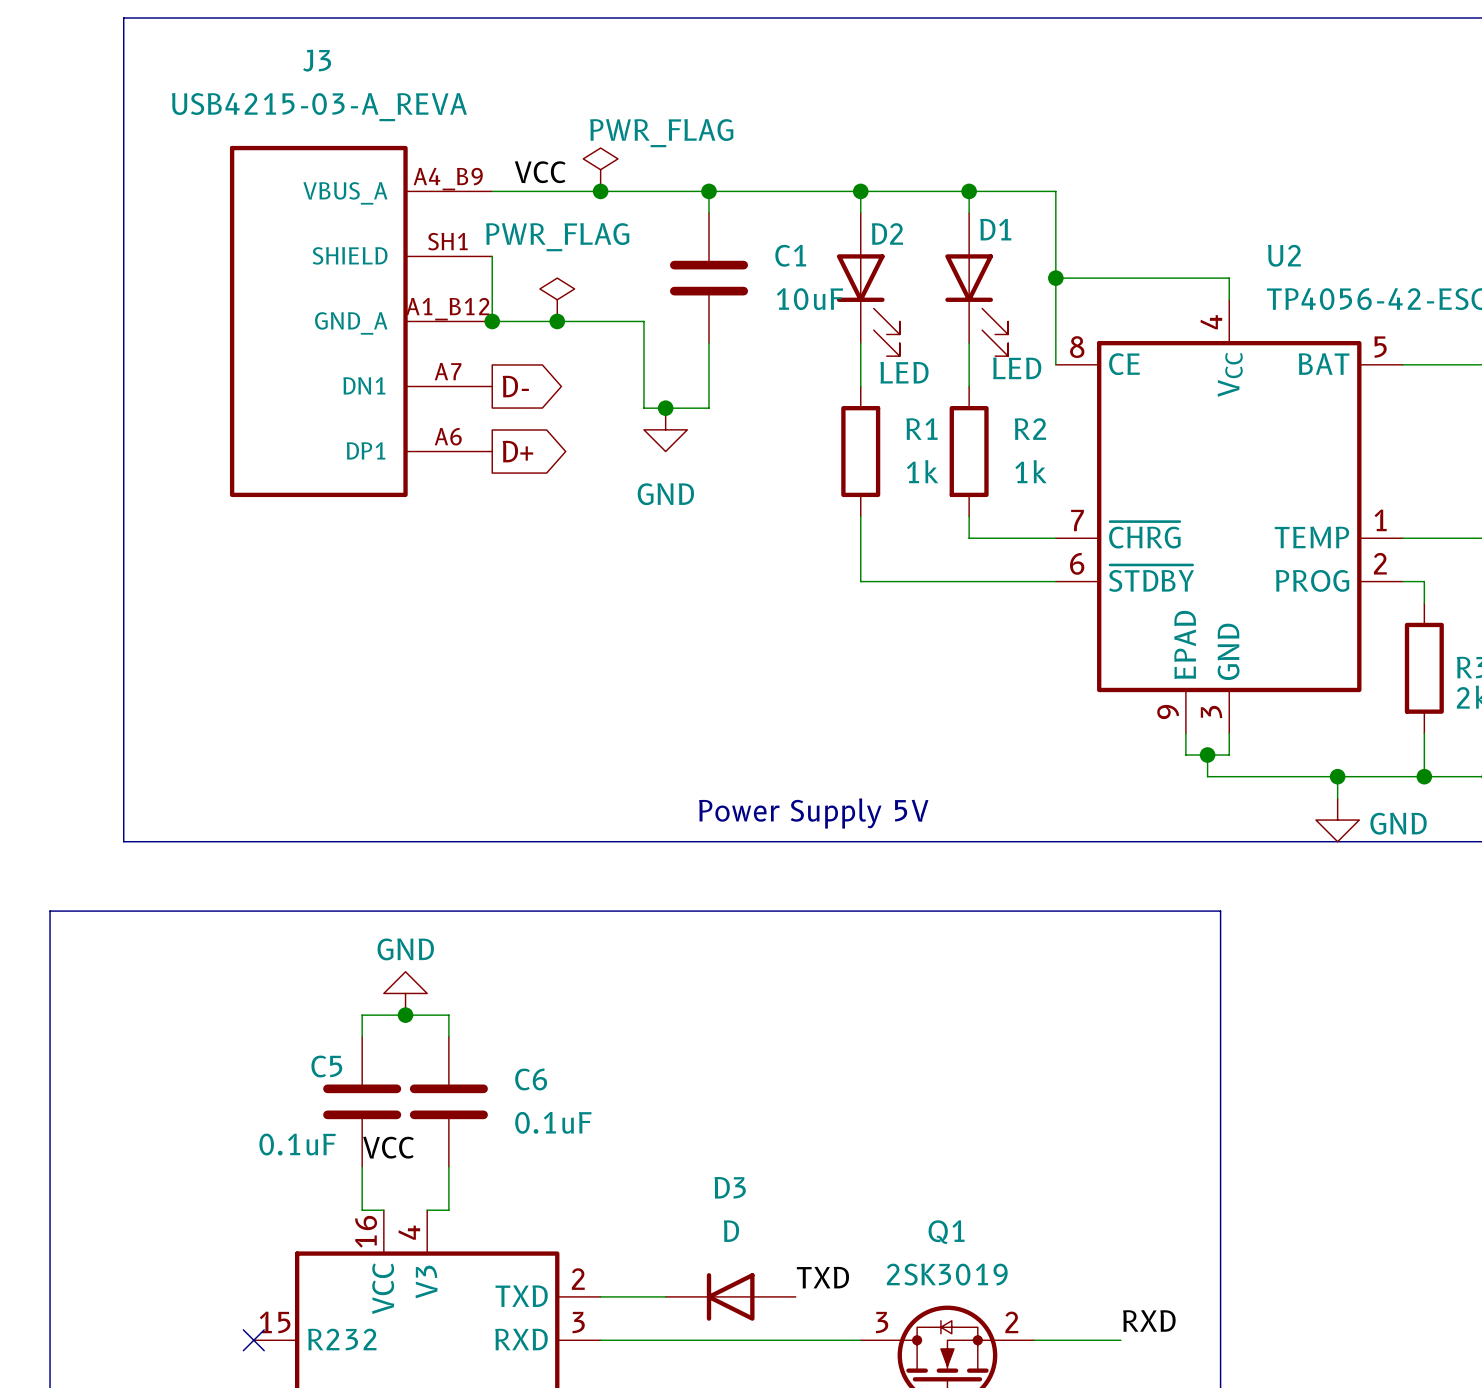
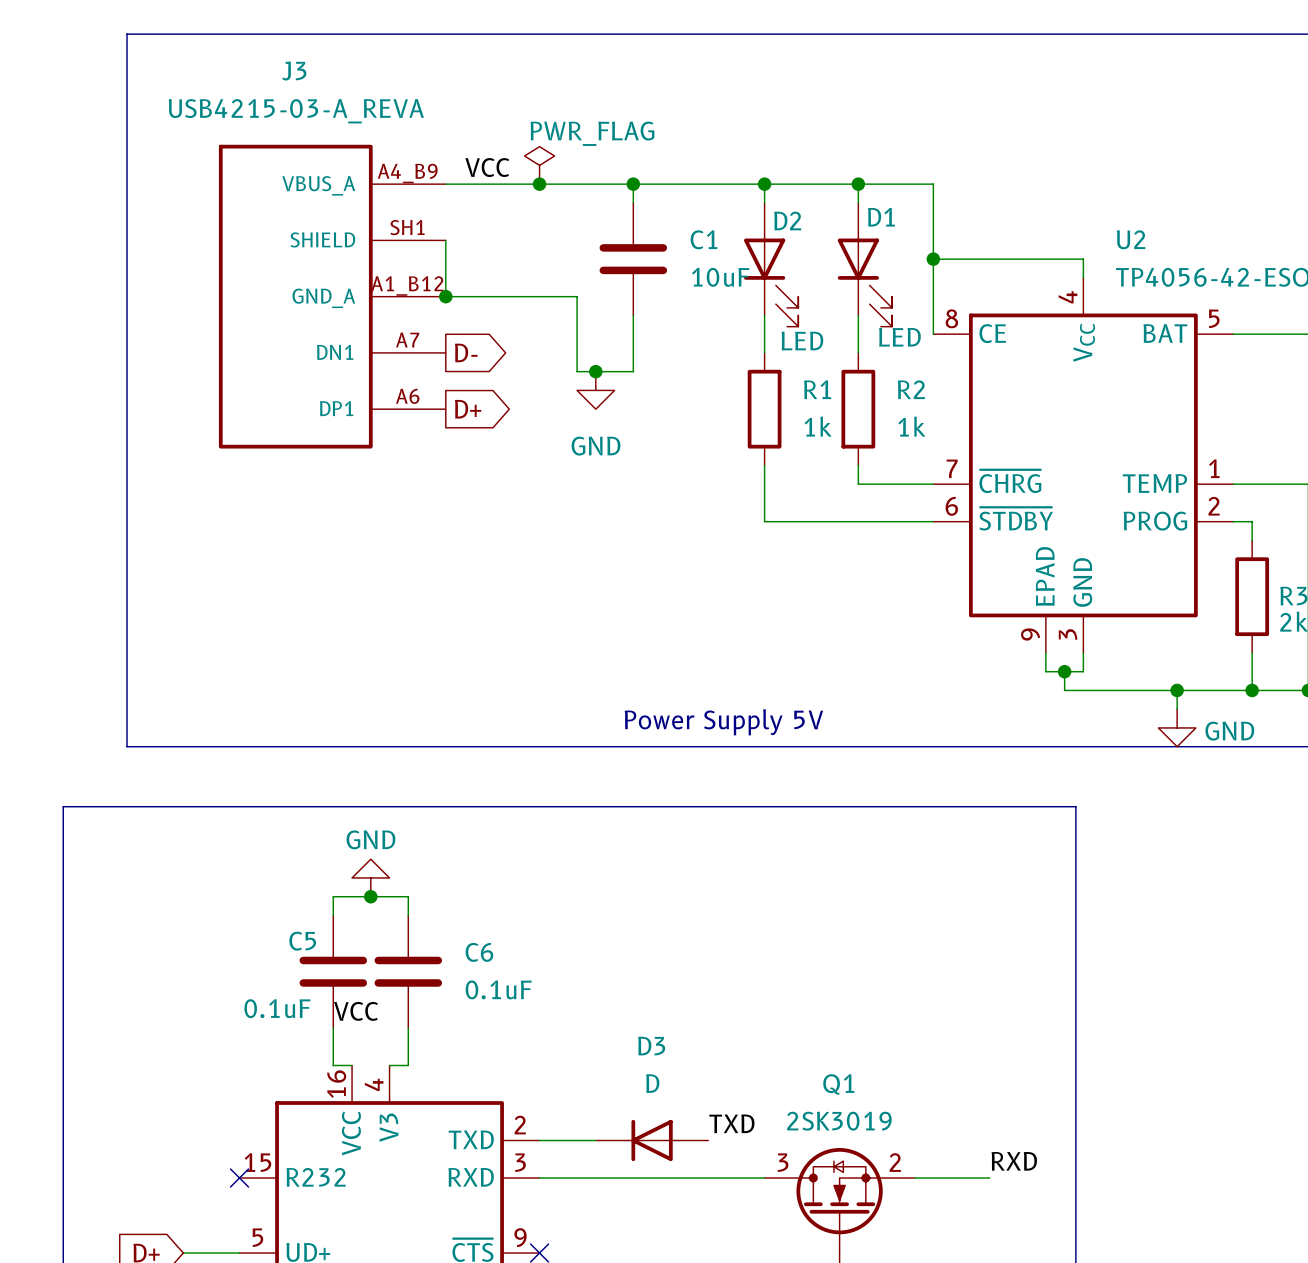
power symbol: PWR_FLAG (557, 299) -> none
junction: (557, 321) -> none

